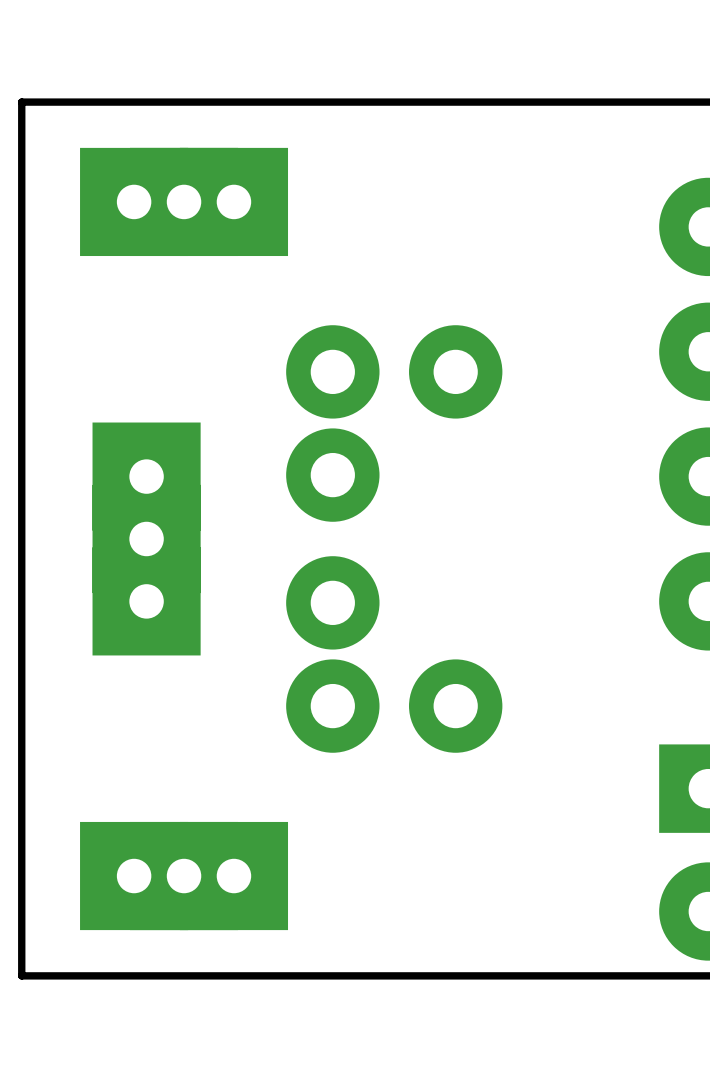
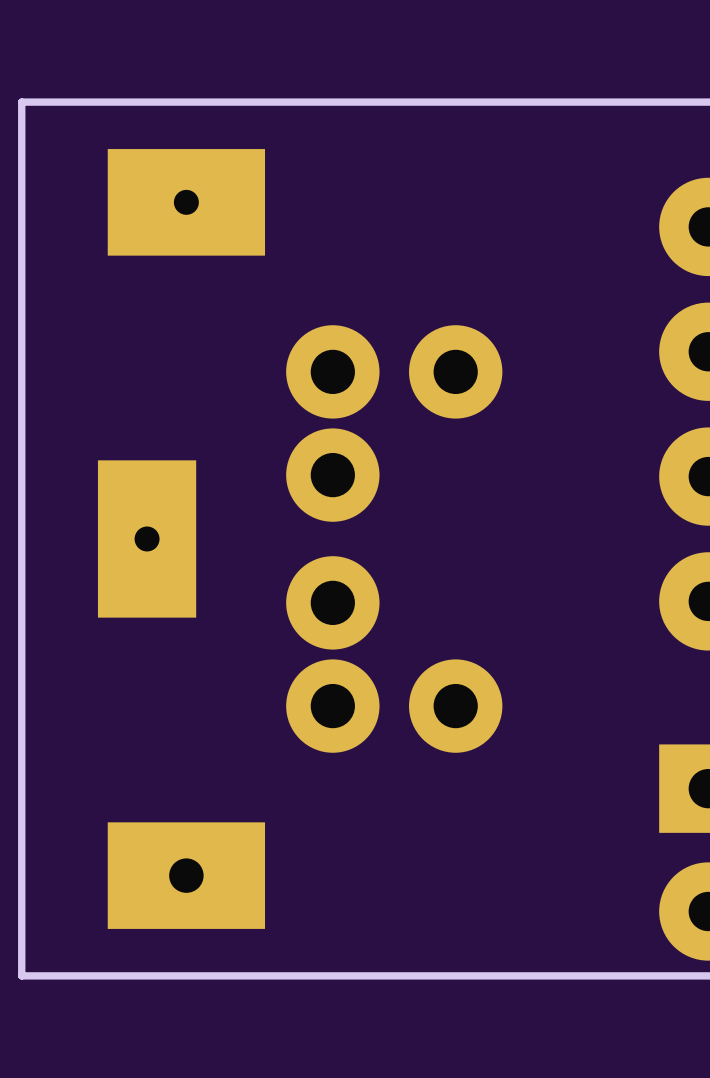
part footprint: [80, 147, 503, 931] -> [97, 149, 503, 929]

